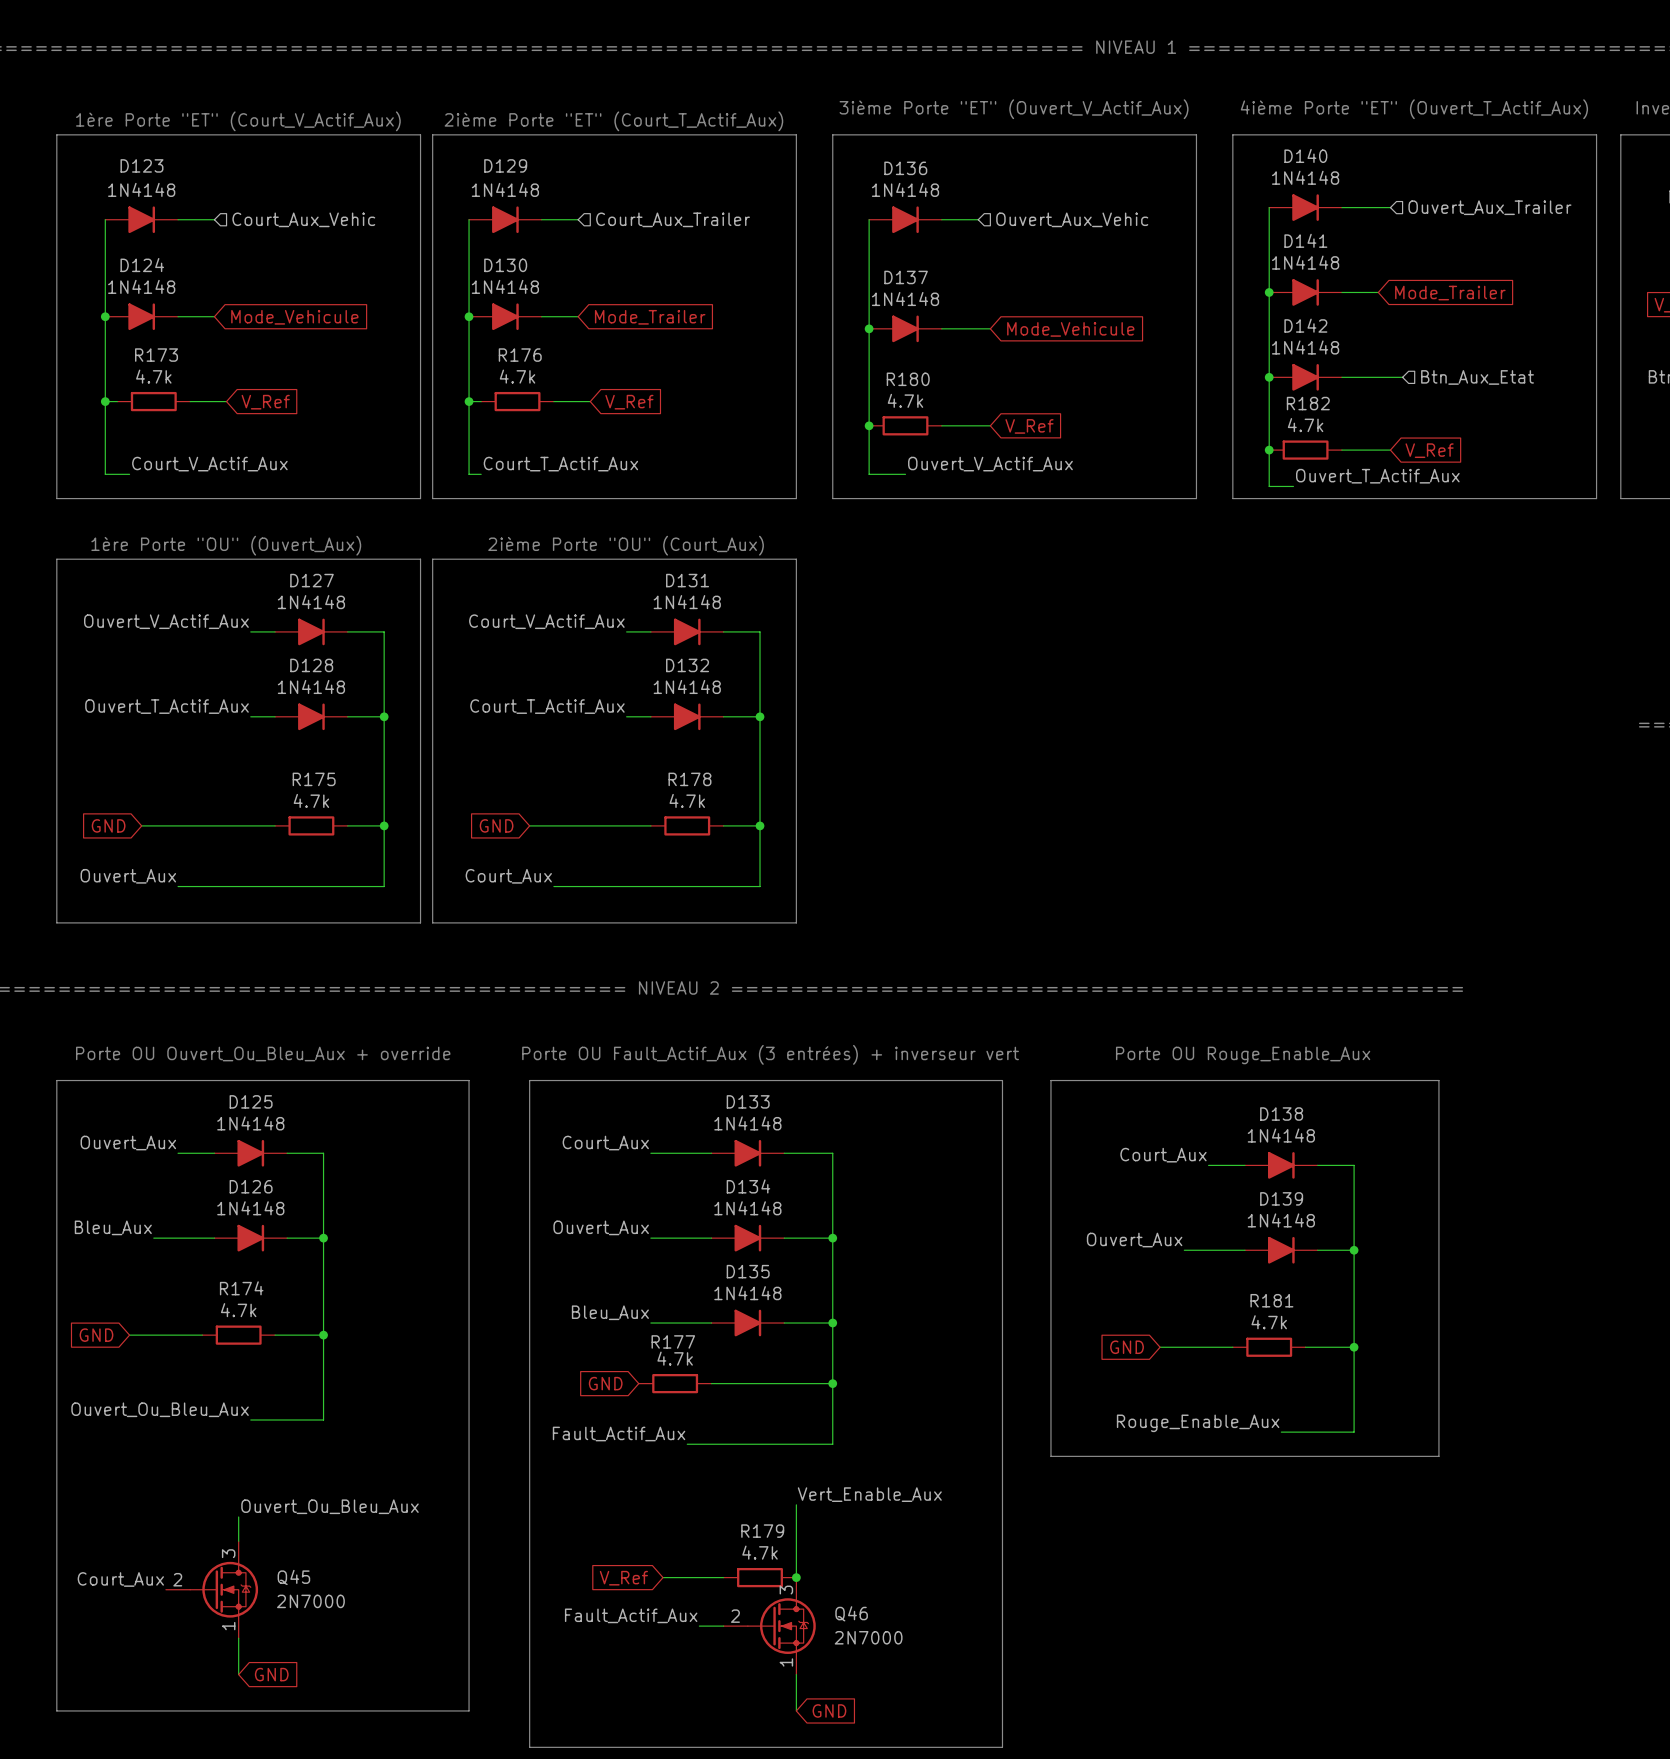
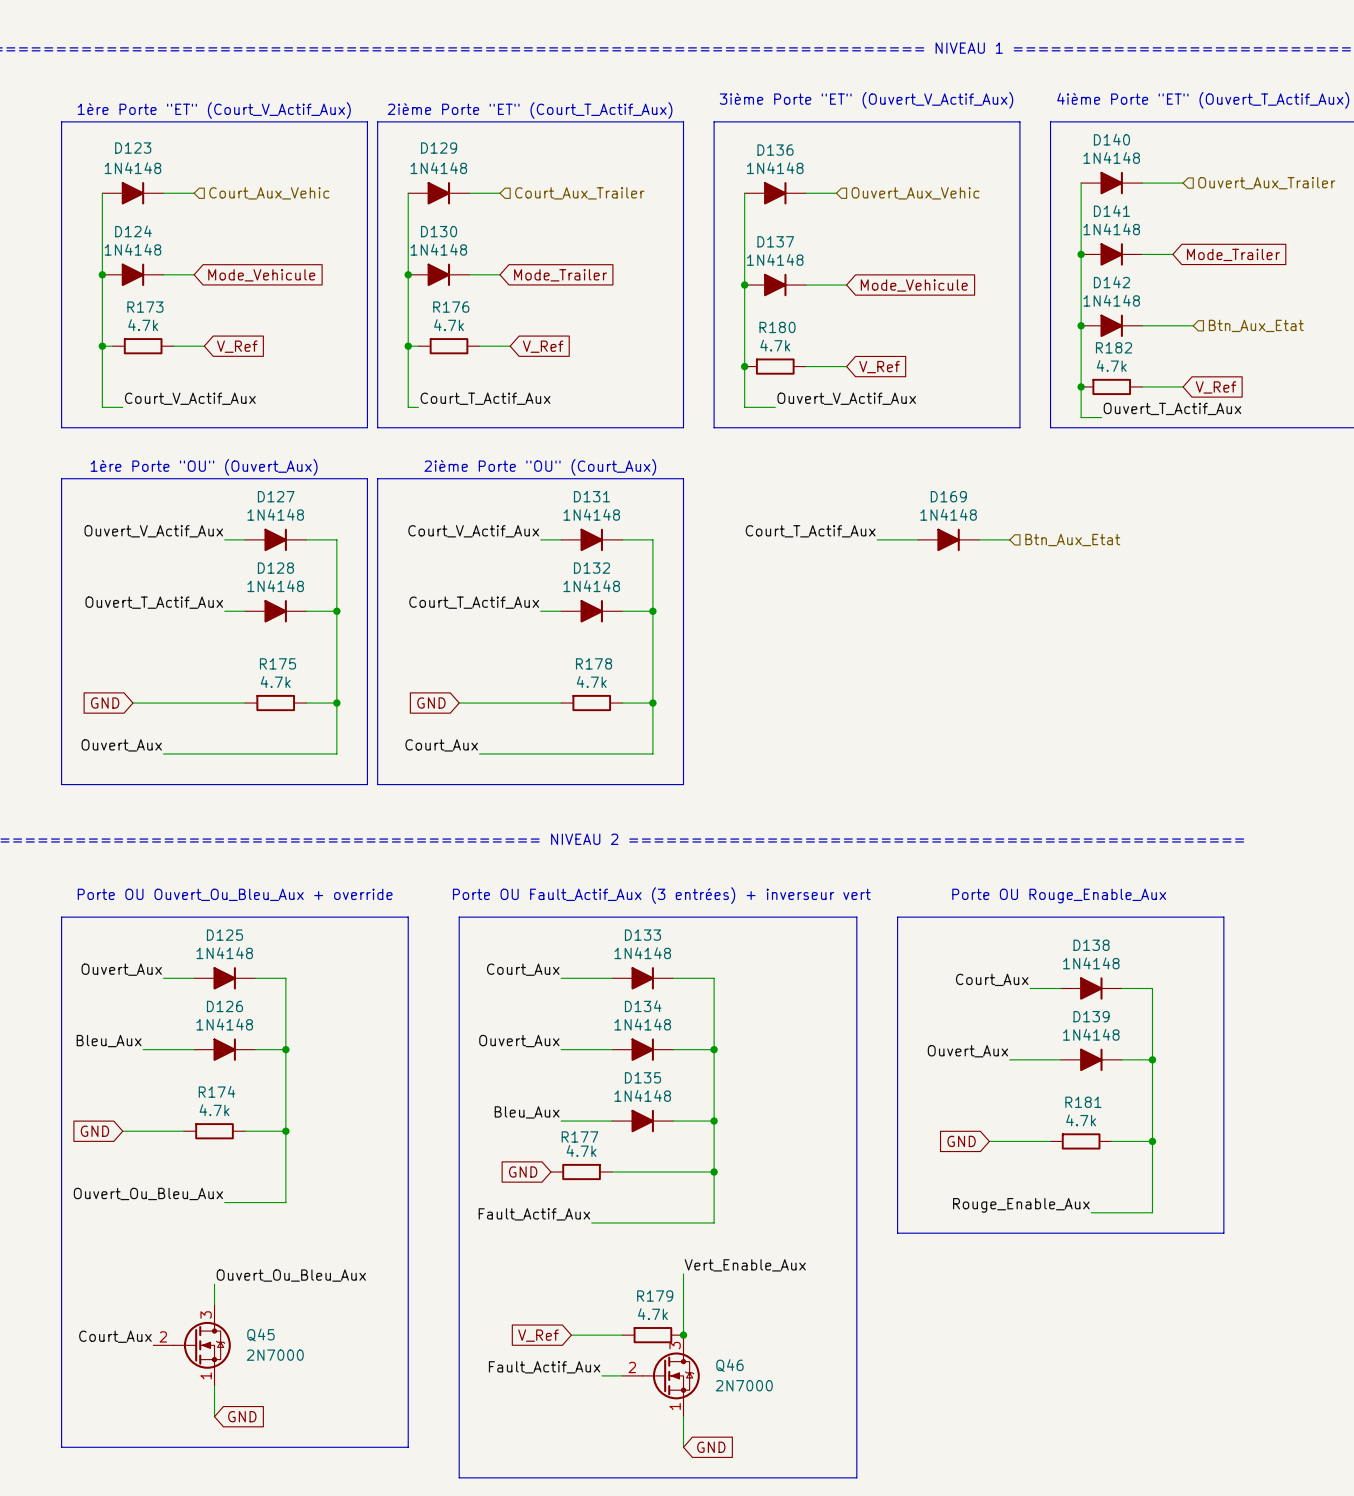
label: none -> Court_T_Actif_Aux (810, 531)
wire: none -> (877, 539) (918, 539)
D169: none -> 1N4148 (948, 539)
wire: none -> (979, 539) (1009, 539)
hierarchical label: none -> Btn_Aux_Etat (1072, 540)

